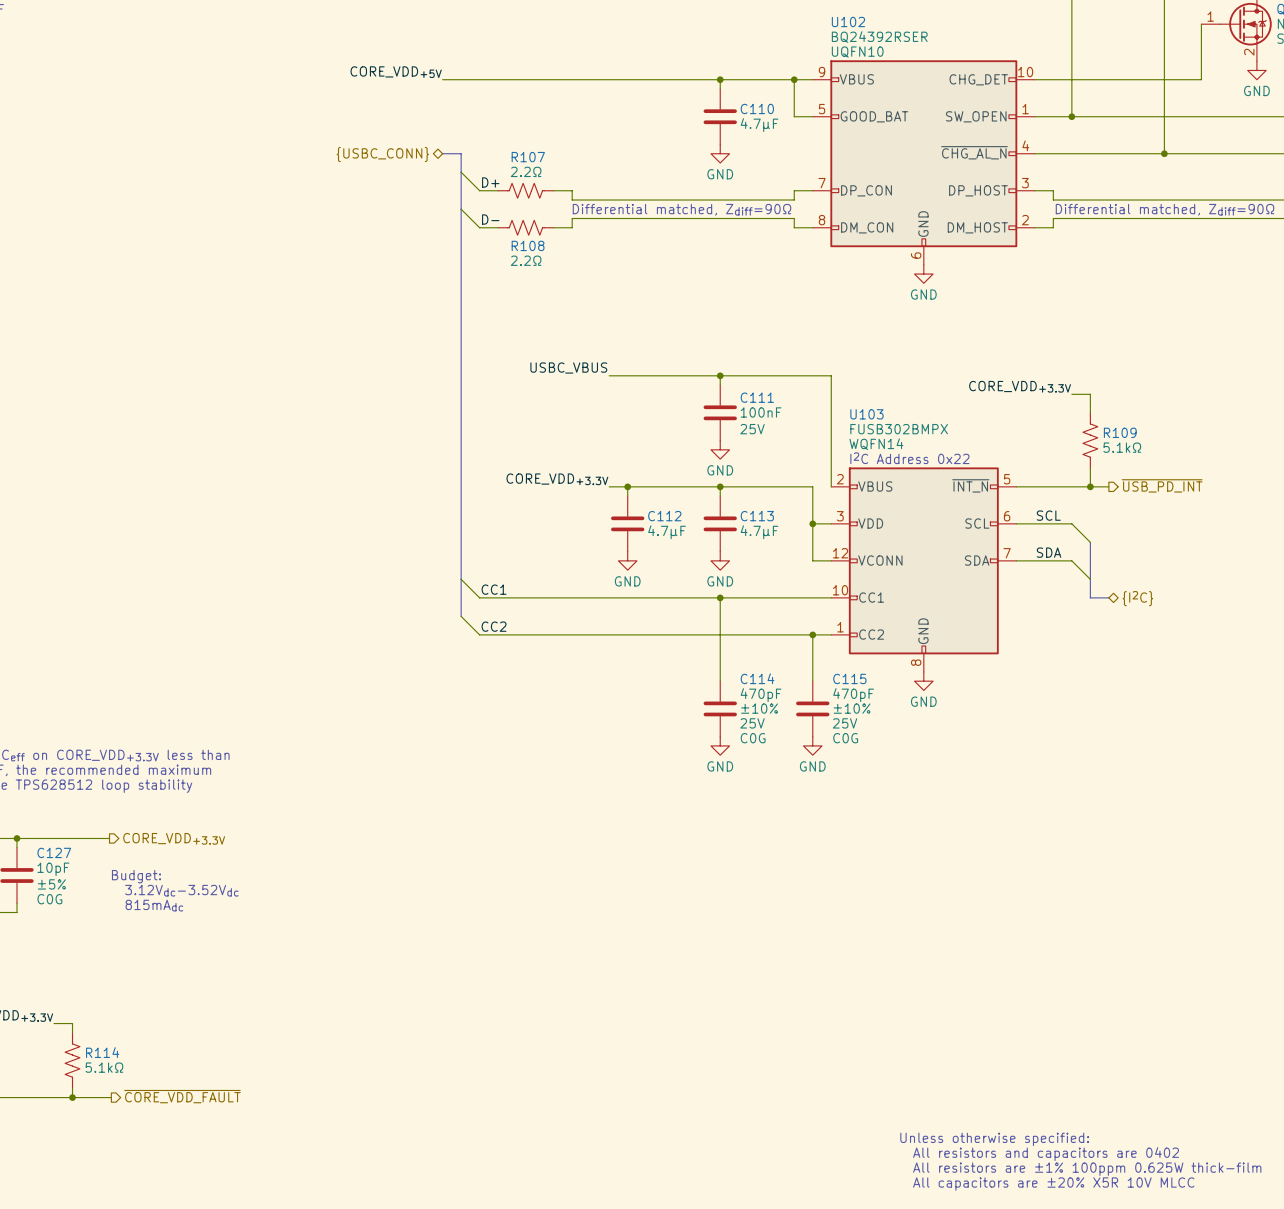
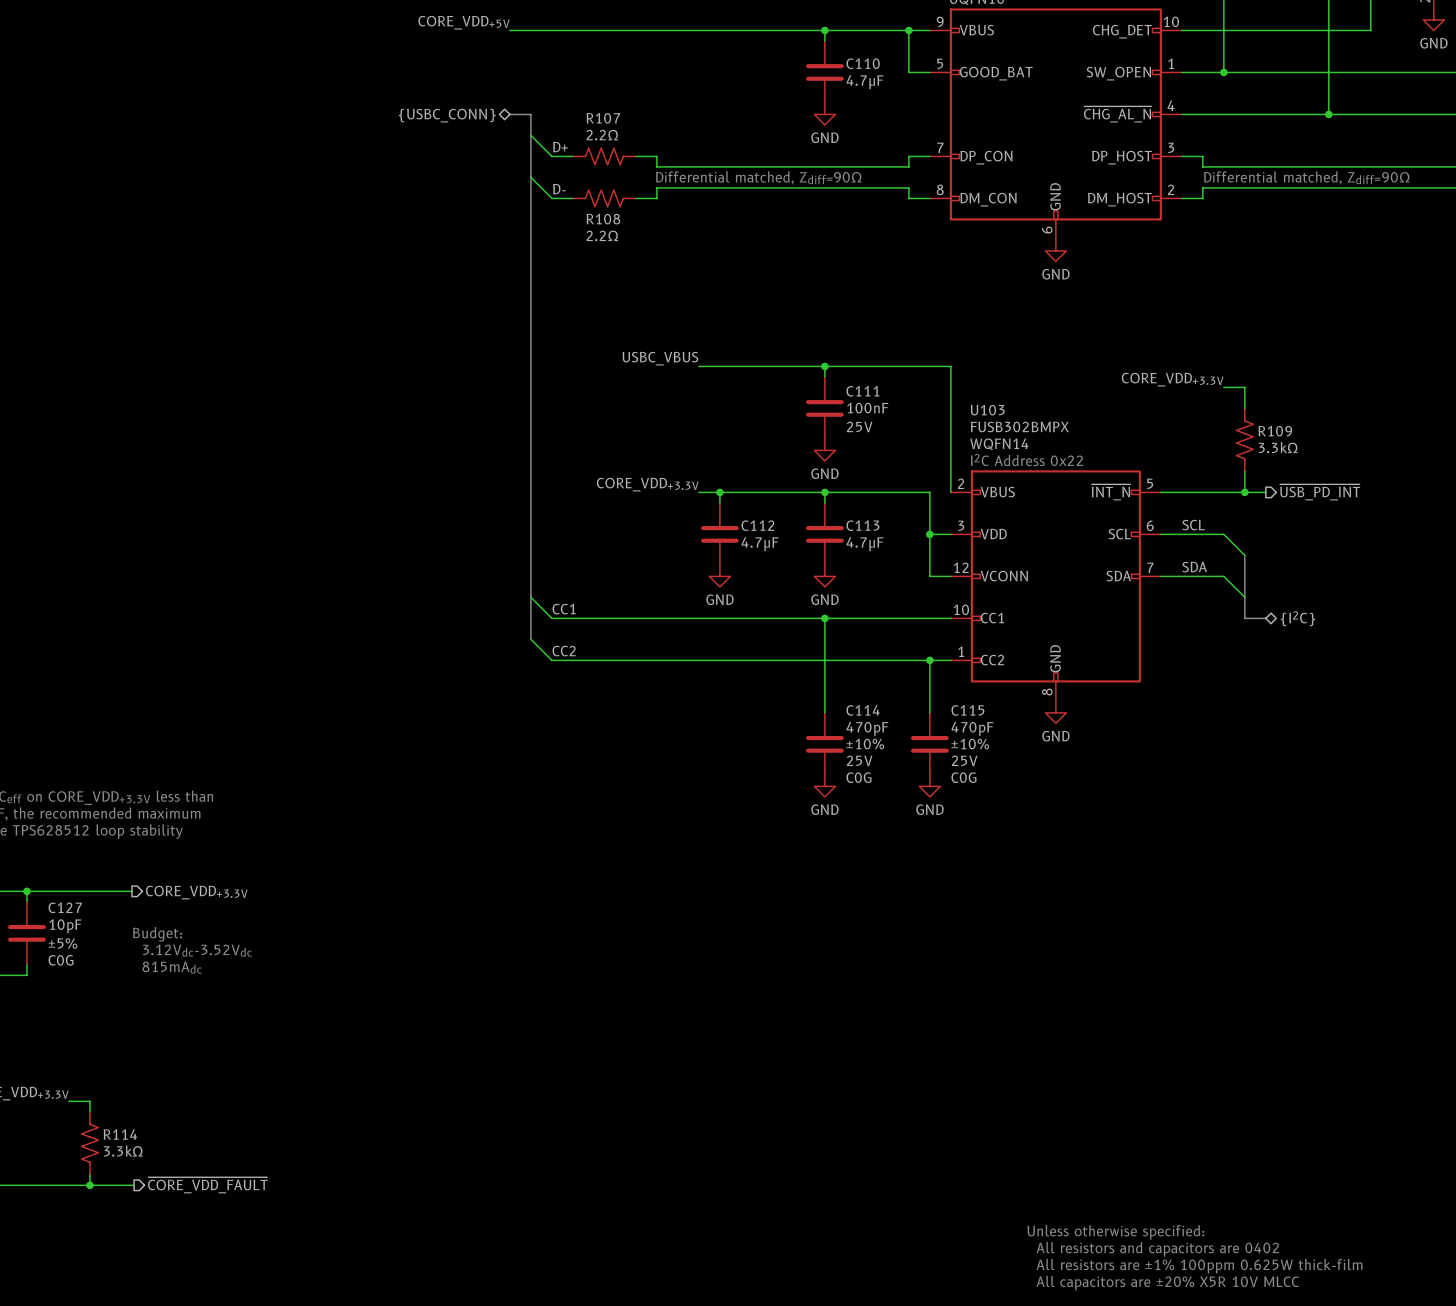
R109 value: 5.1kΩ (1122, 447) -> 3.3kΩ (1278, 447)
R114 value: 5.1kΩ (104, 1067) -> 3.3kΩ (123, 1151)

